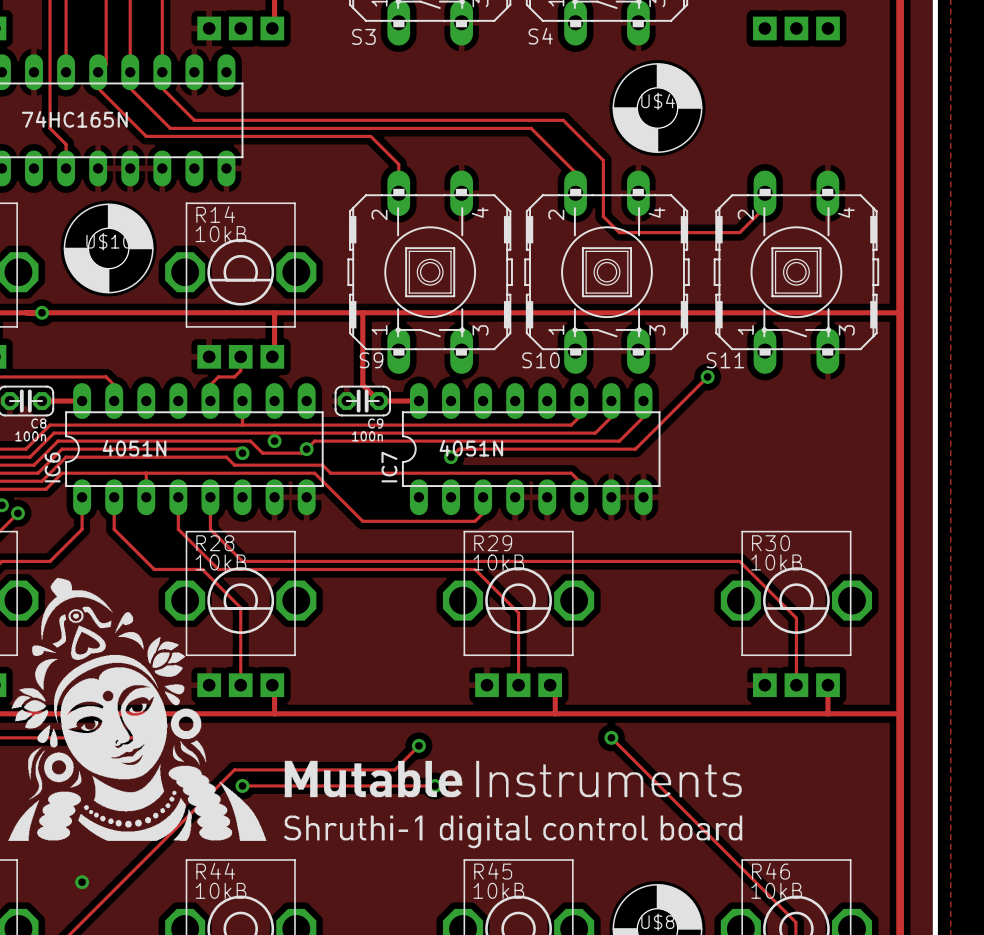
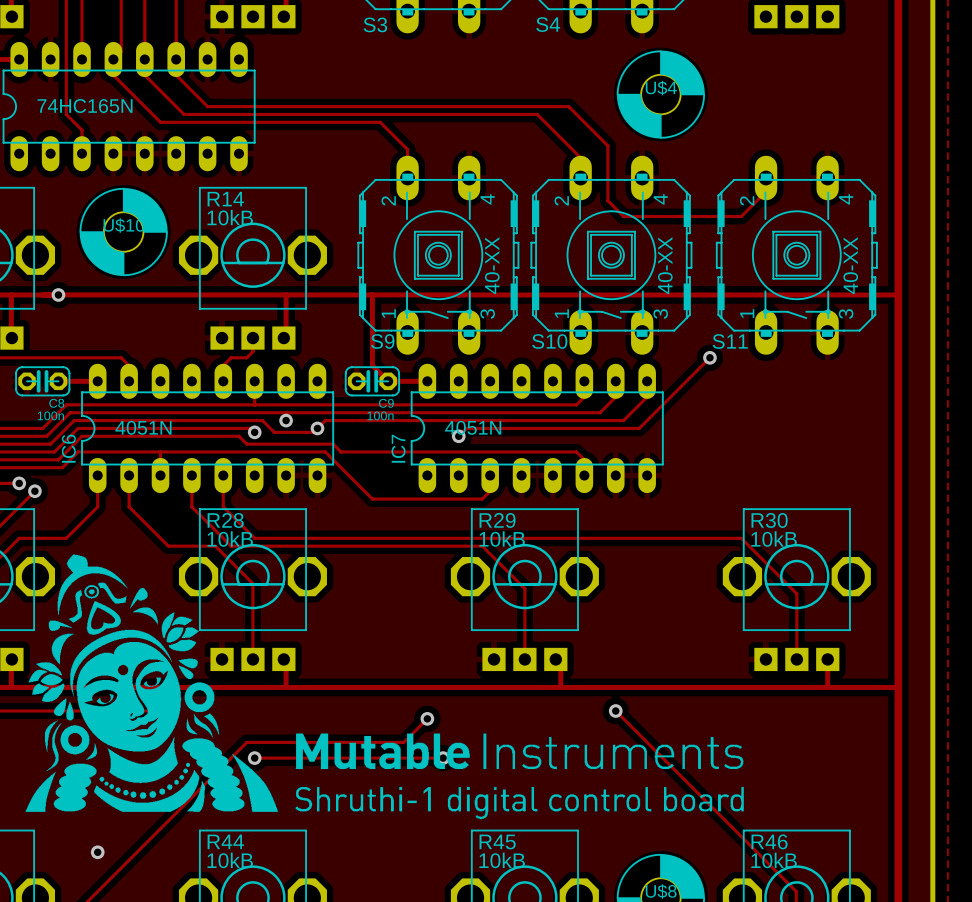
S9 value: none -> 40-XX (492, 265)
S10 value: none -> 40-XX (665, 265)
S11 value: none -> 40-XX (850, 265)

